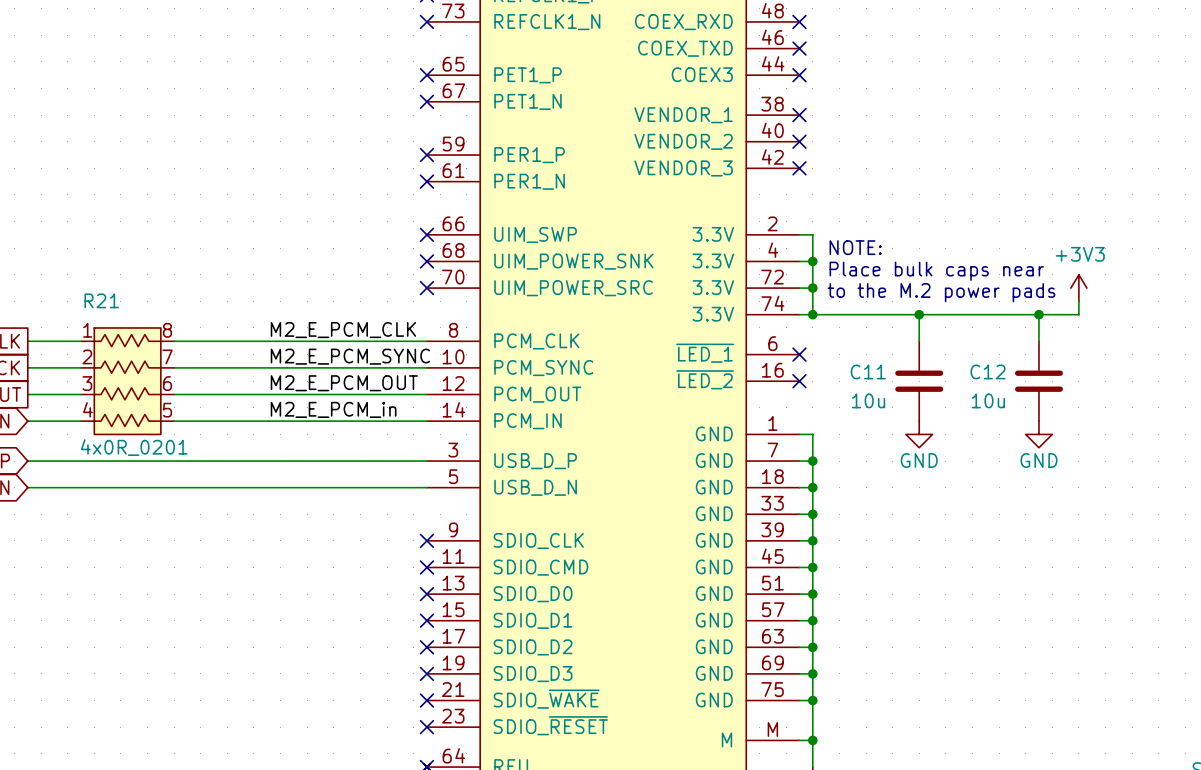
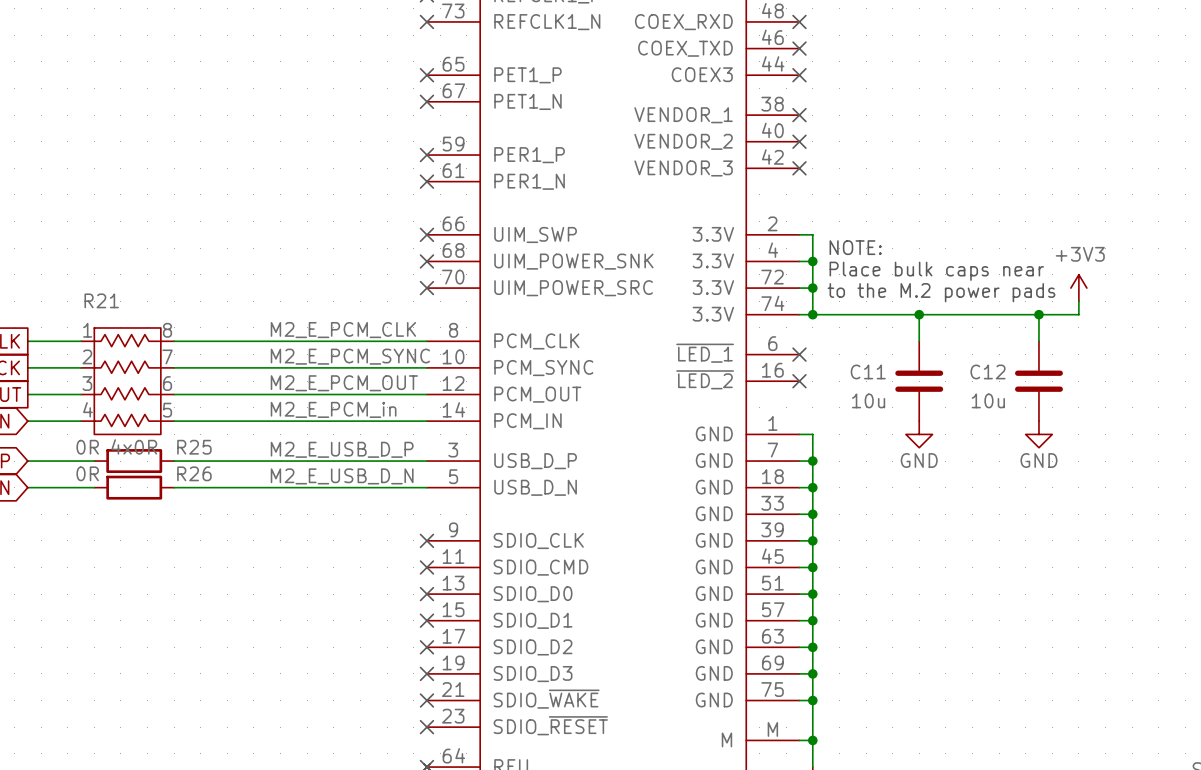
R21 text: 4x0R_0201 (134, 447) -> 4x0R (134, 446)
label: none -> M2_E_USB_D_P (342, 449)
wire: (94, 461) (174, 461) -> none
R25: none -> (134, 461)
label: none -> M2_E_USB_D_N (342, 476)
wire: (94, 487) (174, 487) -> none
R26: none -> (134, 487)

